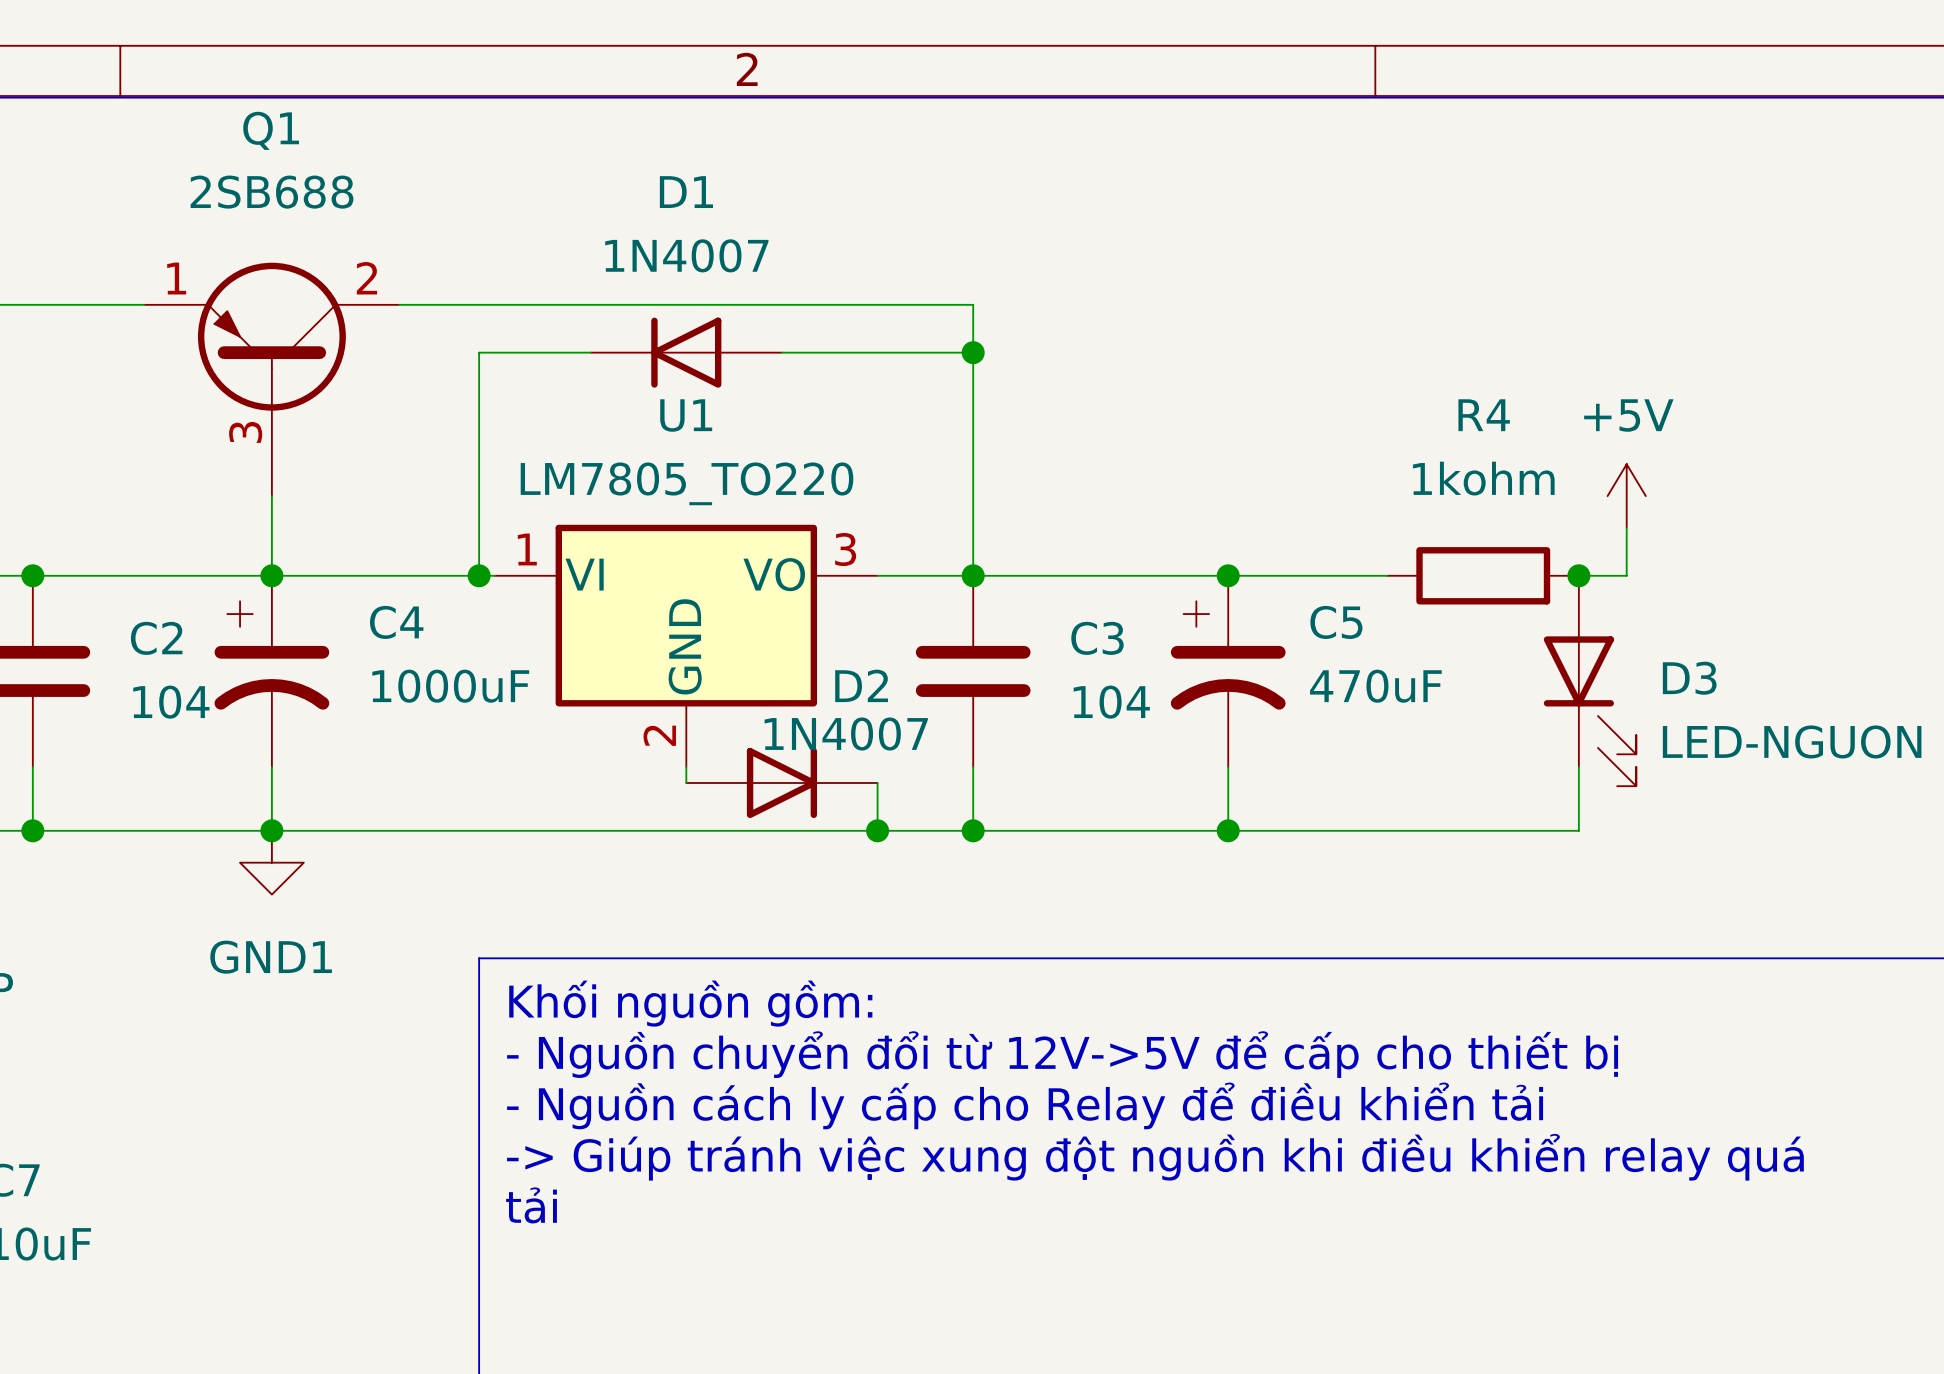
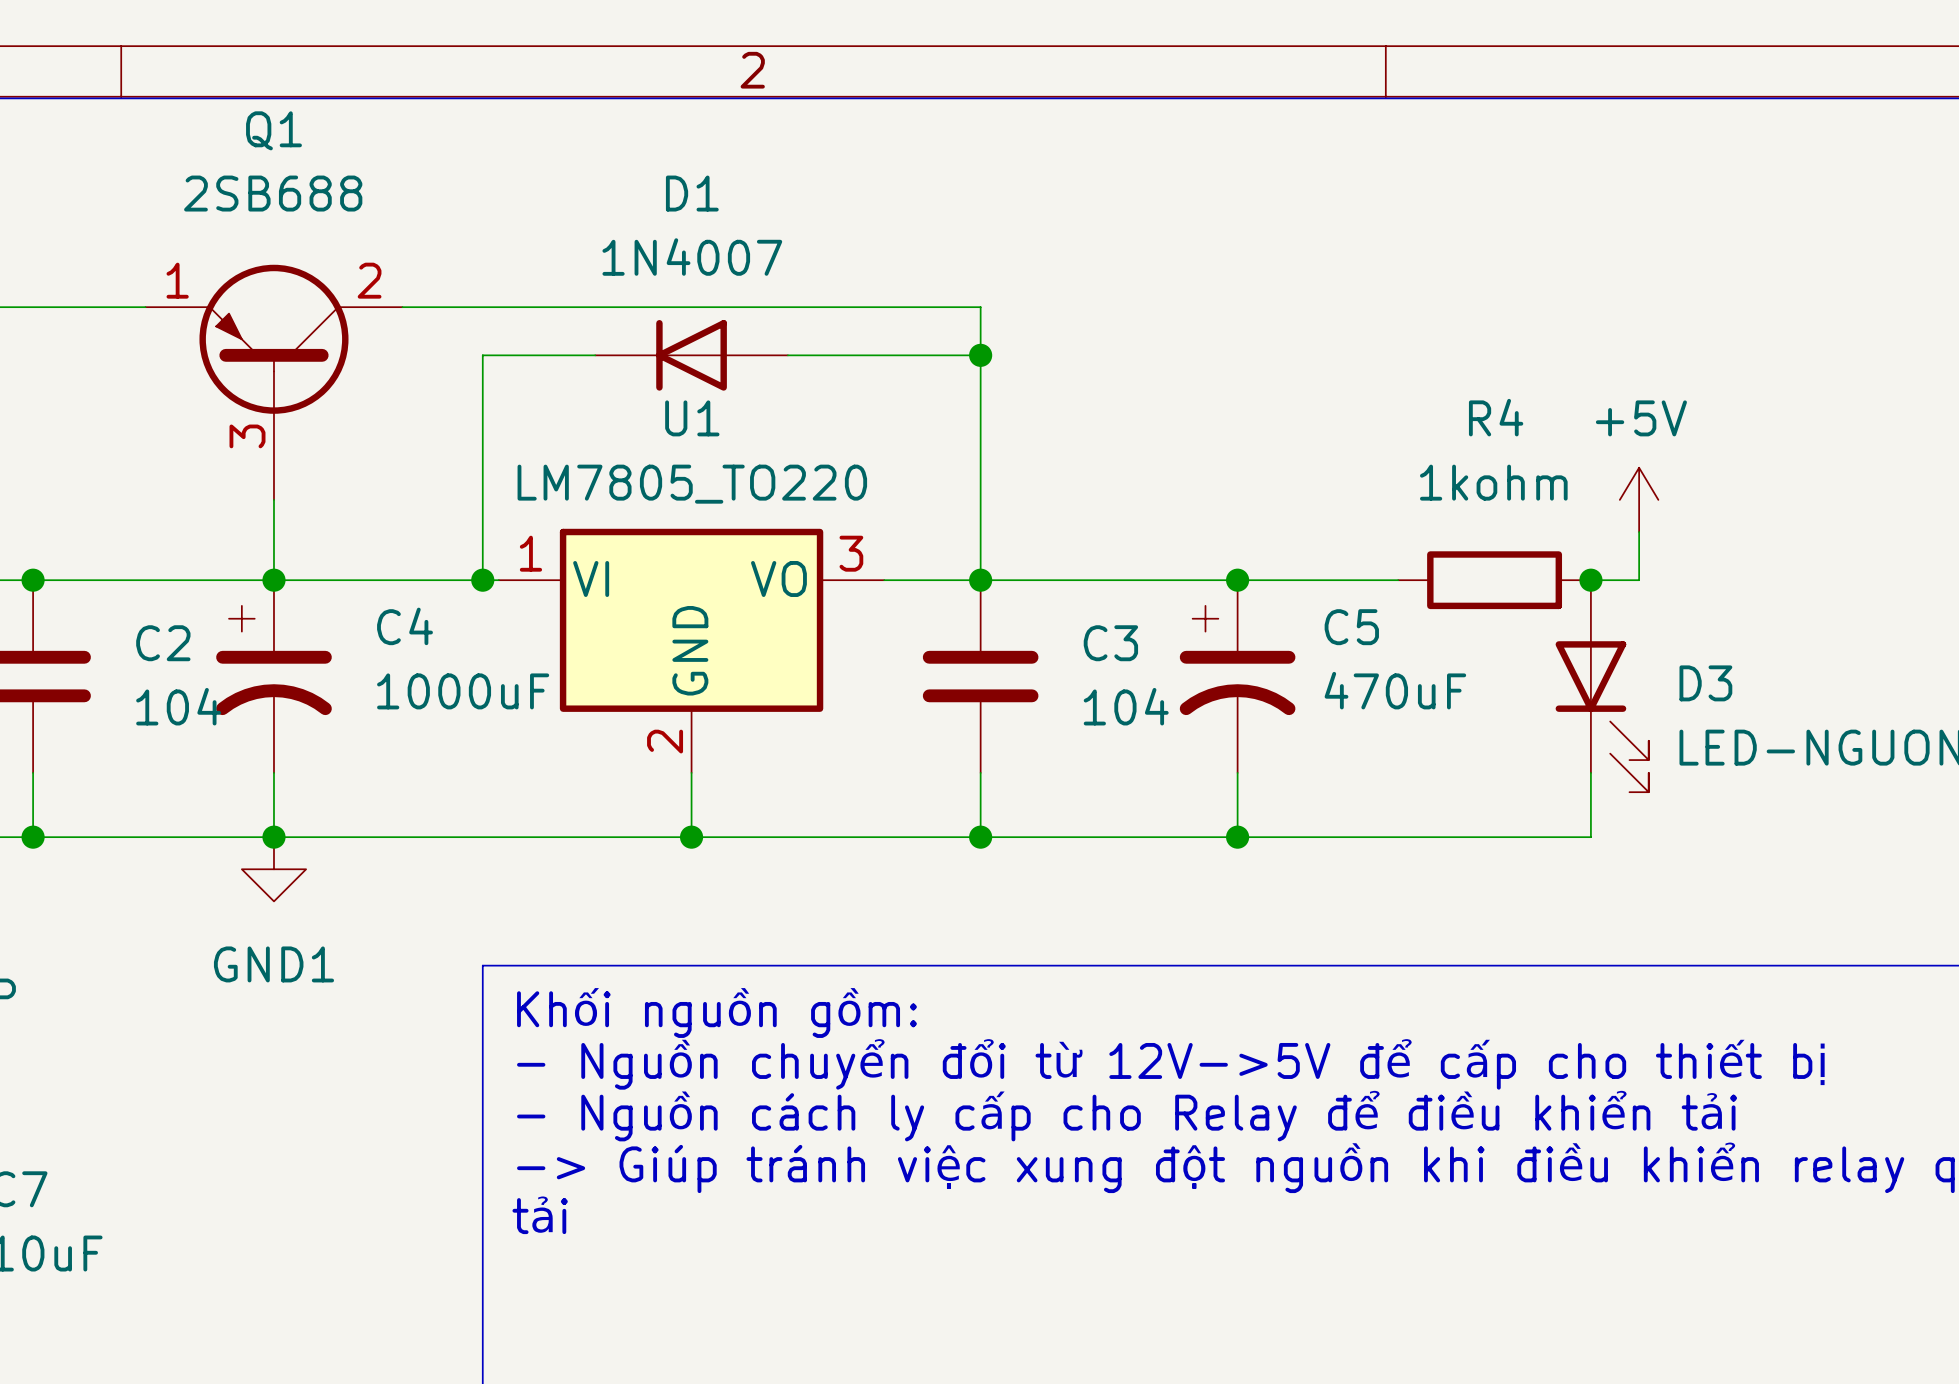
D2: 1N4007 (781, 782) -> none
wire: (877, 782) (877, 830) -> (691, 788) (691, 837)
junction: none -> (691, 837)
junction: (877, 830) -> none

